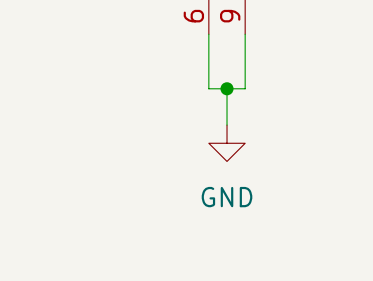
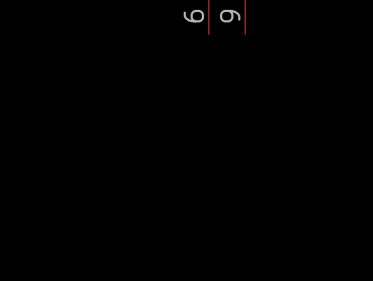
wire: (208, 34) (208, 88) (245, 88) (245, 34) -> none
wire: (227, 88) (227, 125) -> none
junction: (227, 88) -> none
power symbol: GND (227, 143) -> none

